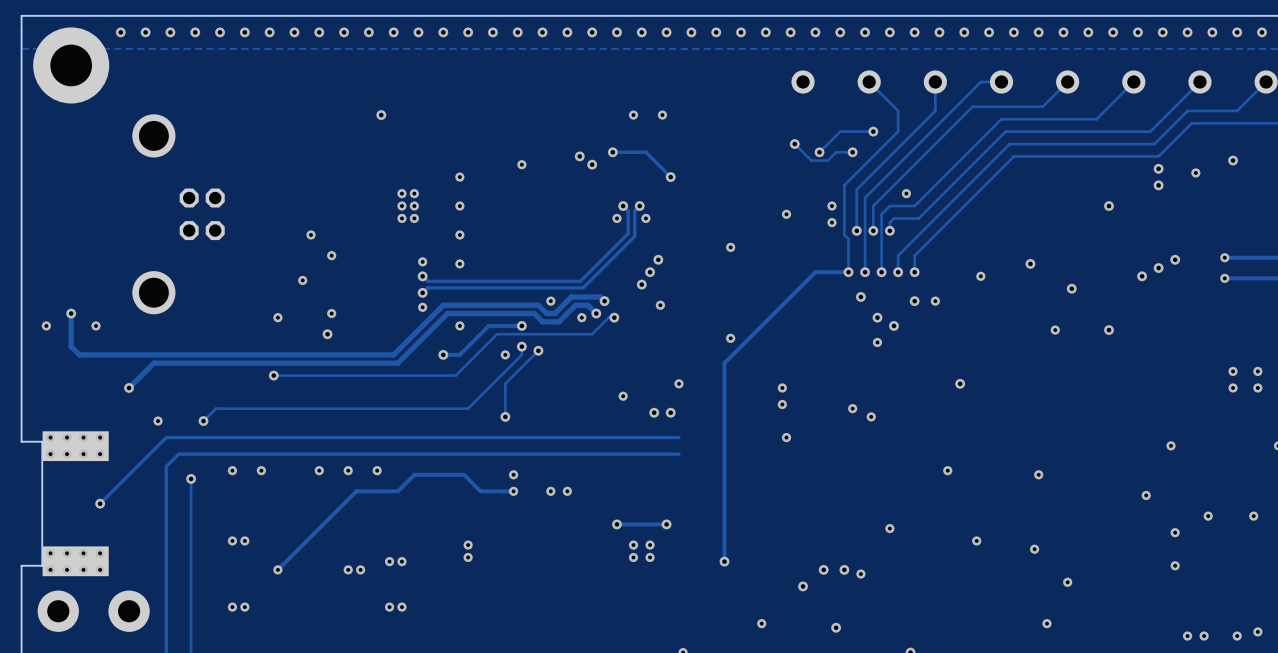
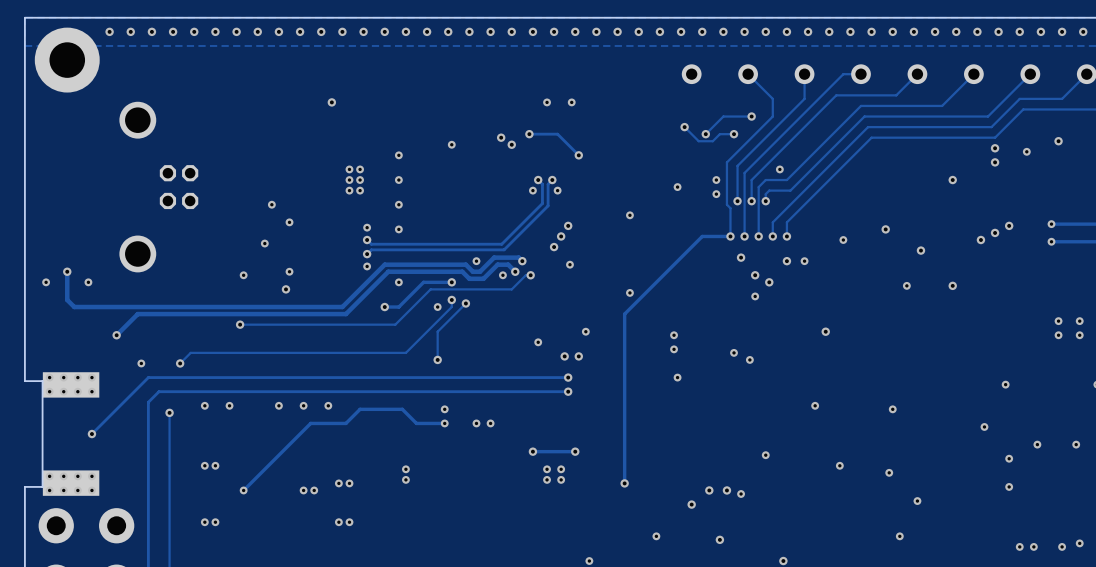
via: none -> (568, 377)
track: (678, 437) (658, 437) -> none
via: none -> (568, 391)
track: (678, 454) (658, 454) -> none

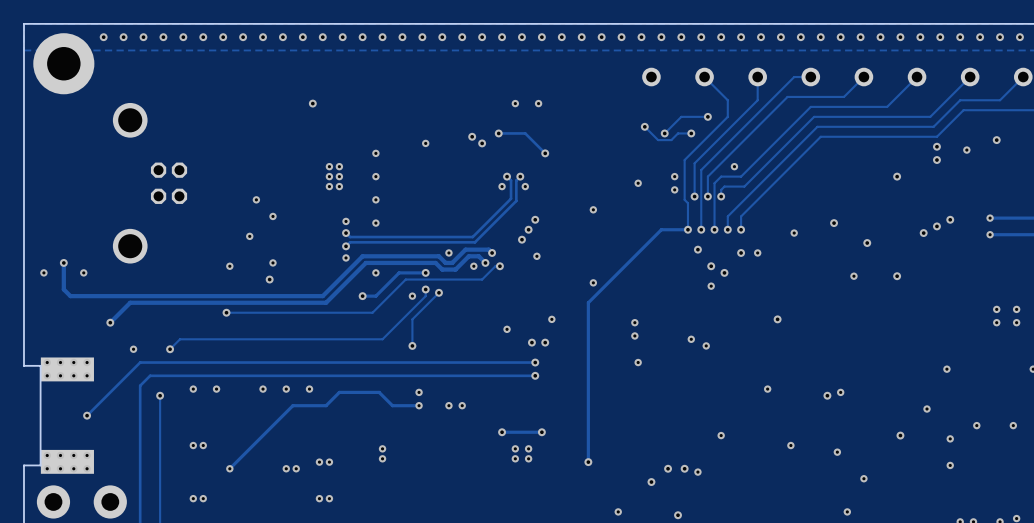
via: none -> (827, 395)
via: none -> (900, 435)

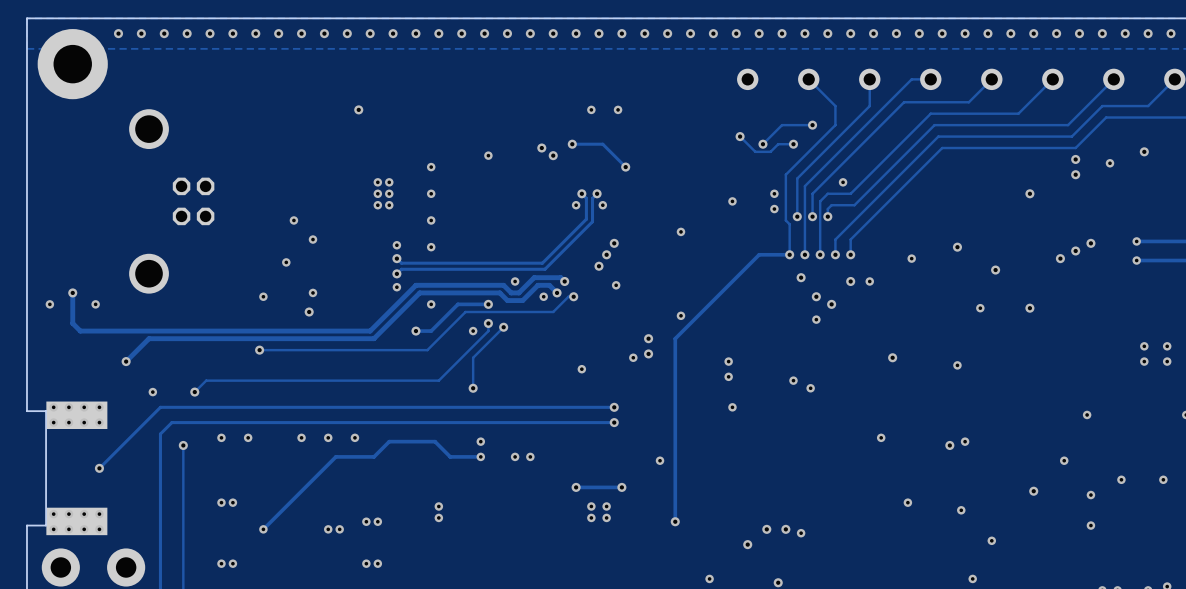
via: none -> (648, 338)
via: none -> (648, 353)
via: none -> (957, 365)
via: (531, 342) -> none
via: (545, 342) -> none
via: none -> (660, 460)
via: (721, 435) -> none

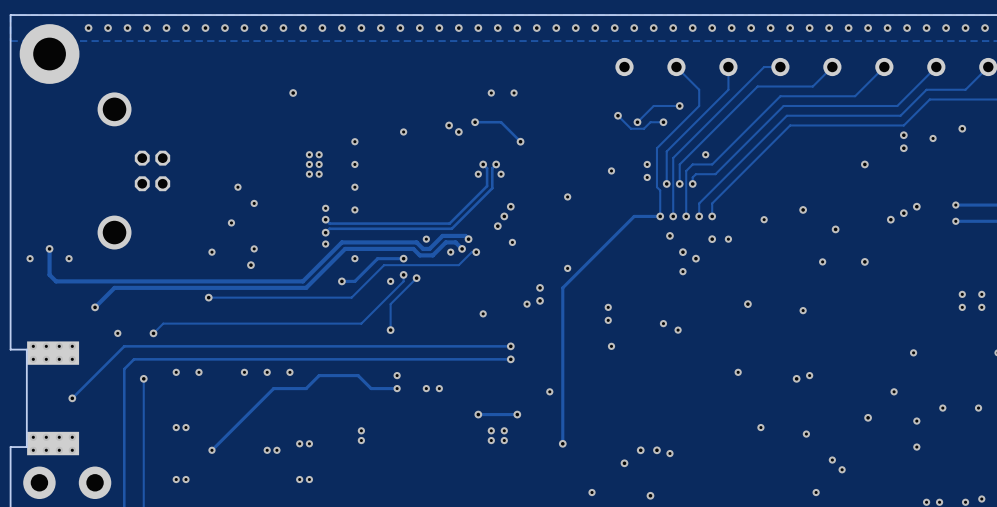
via: none -> (842, 469)

